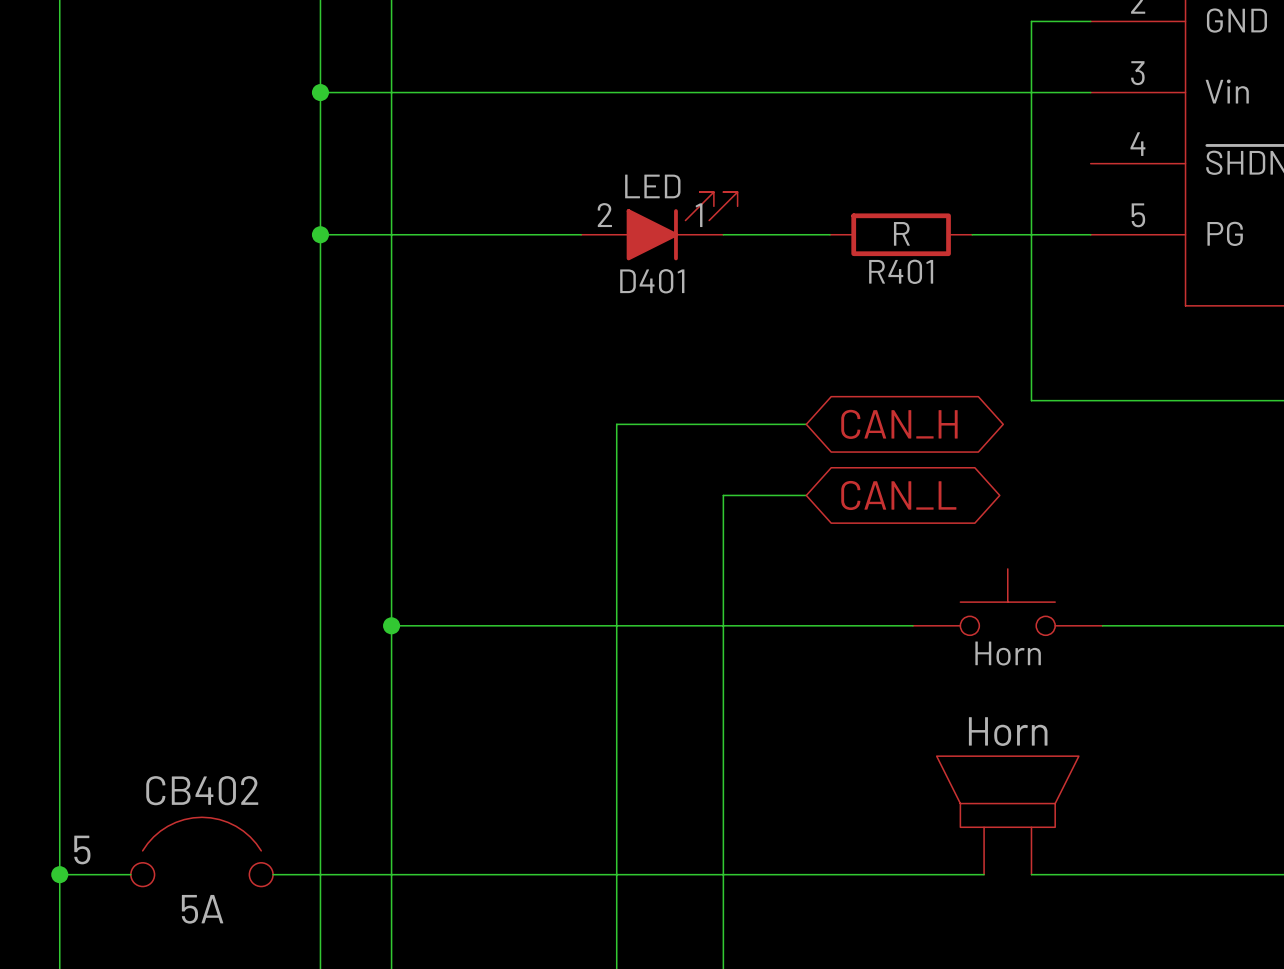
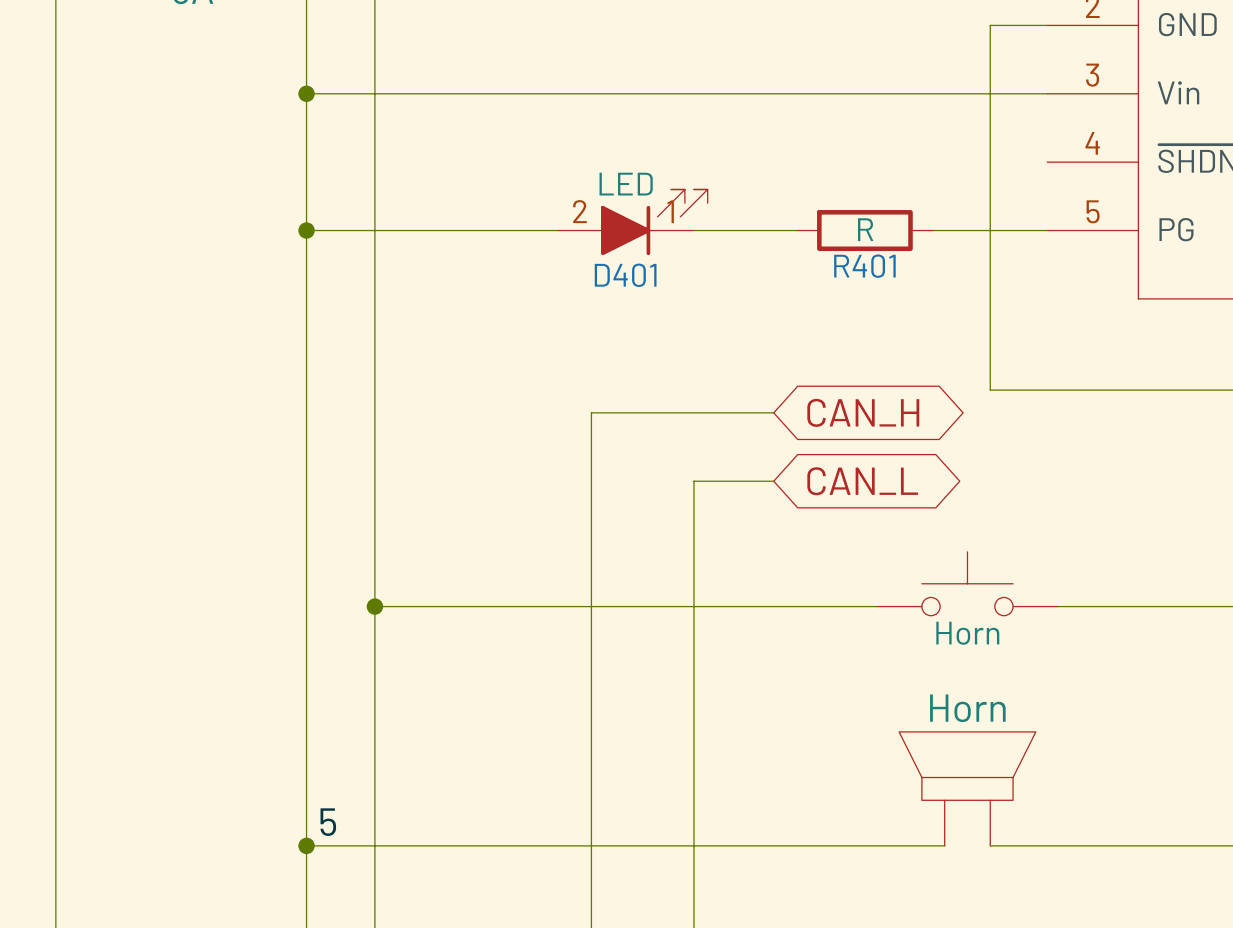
label position: 5 (82, 849) -> 5 (328, 822)
CB402: 5A (201, 851) -> none
wire: (59, 874) (130, 874) -> none
junction: (59, 874) -> none
wire: (273, 874) (320, 874) -> none
junction: none -> (306, 845)

